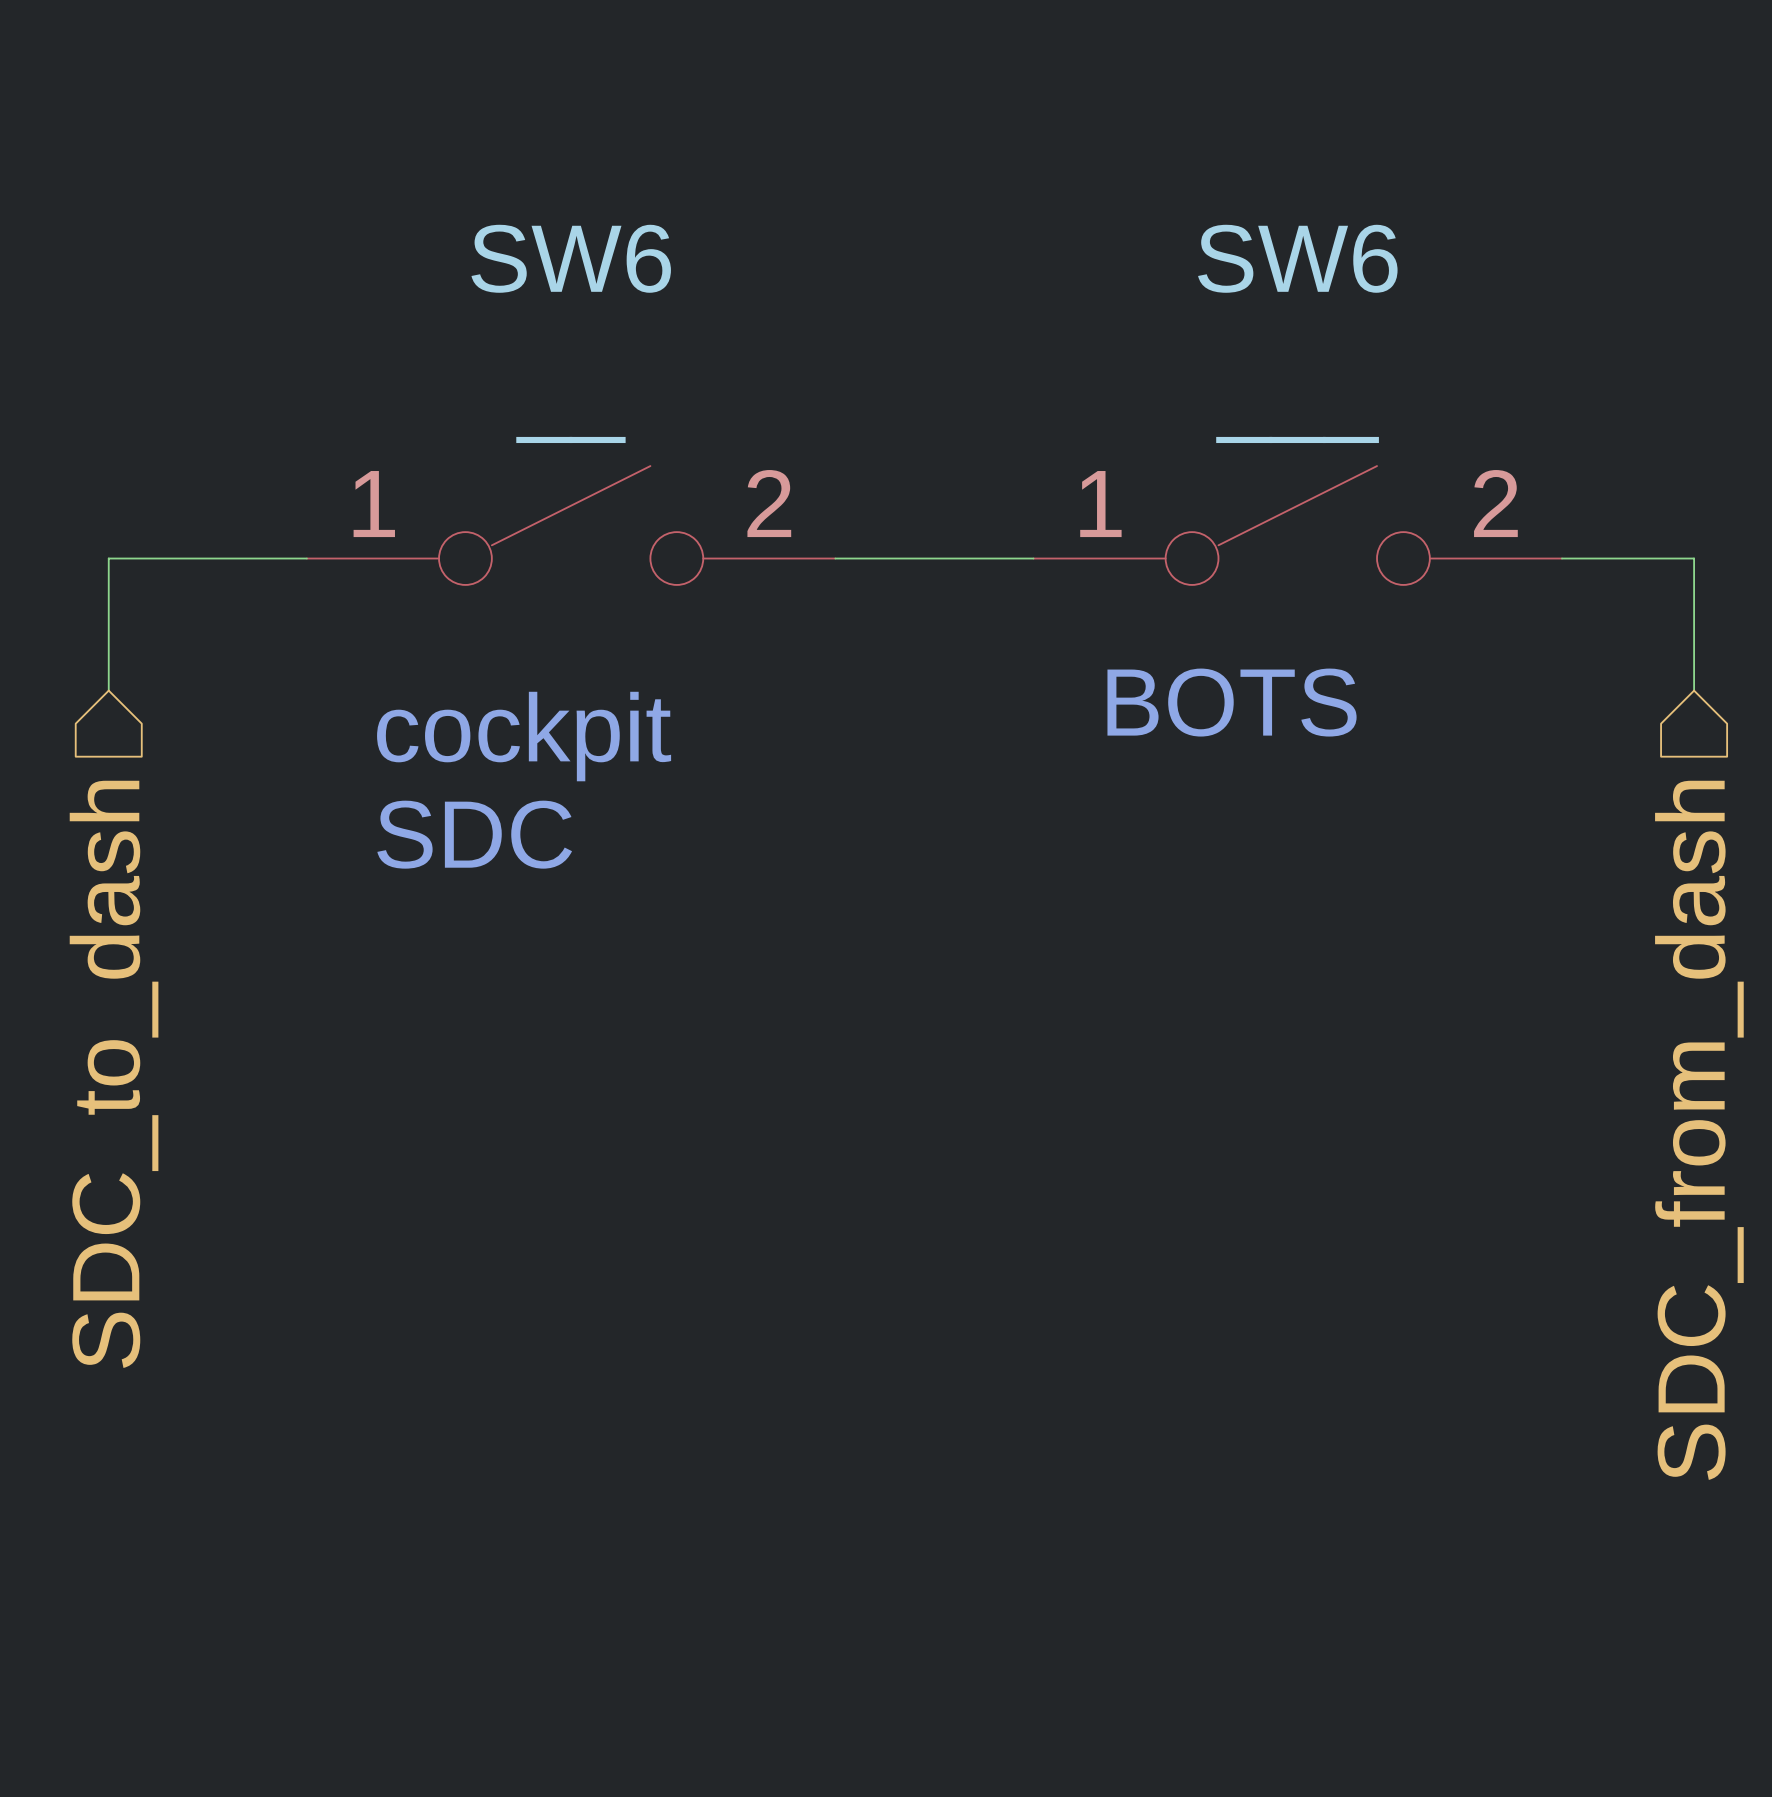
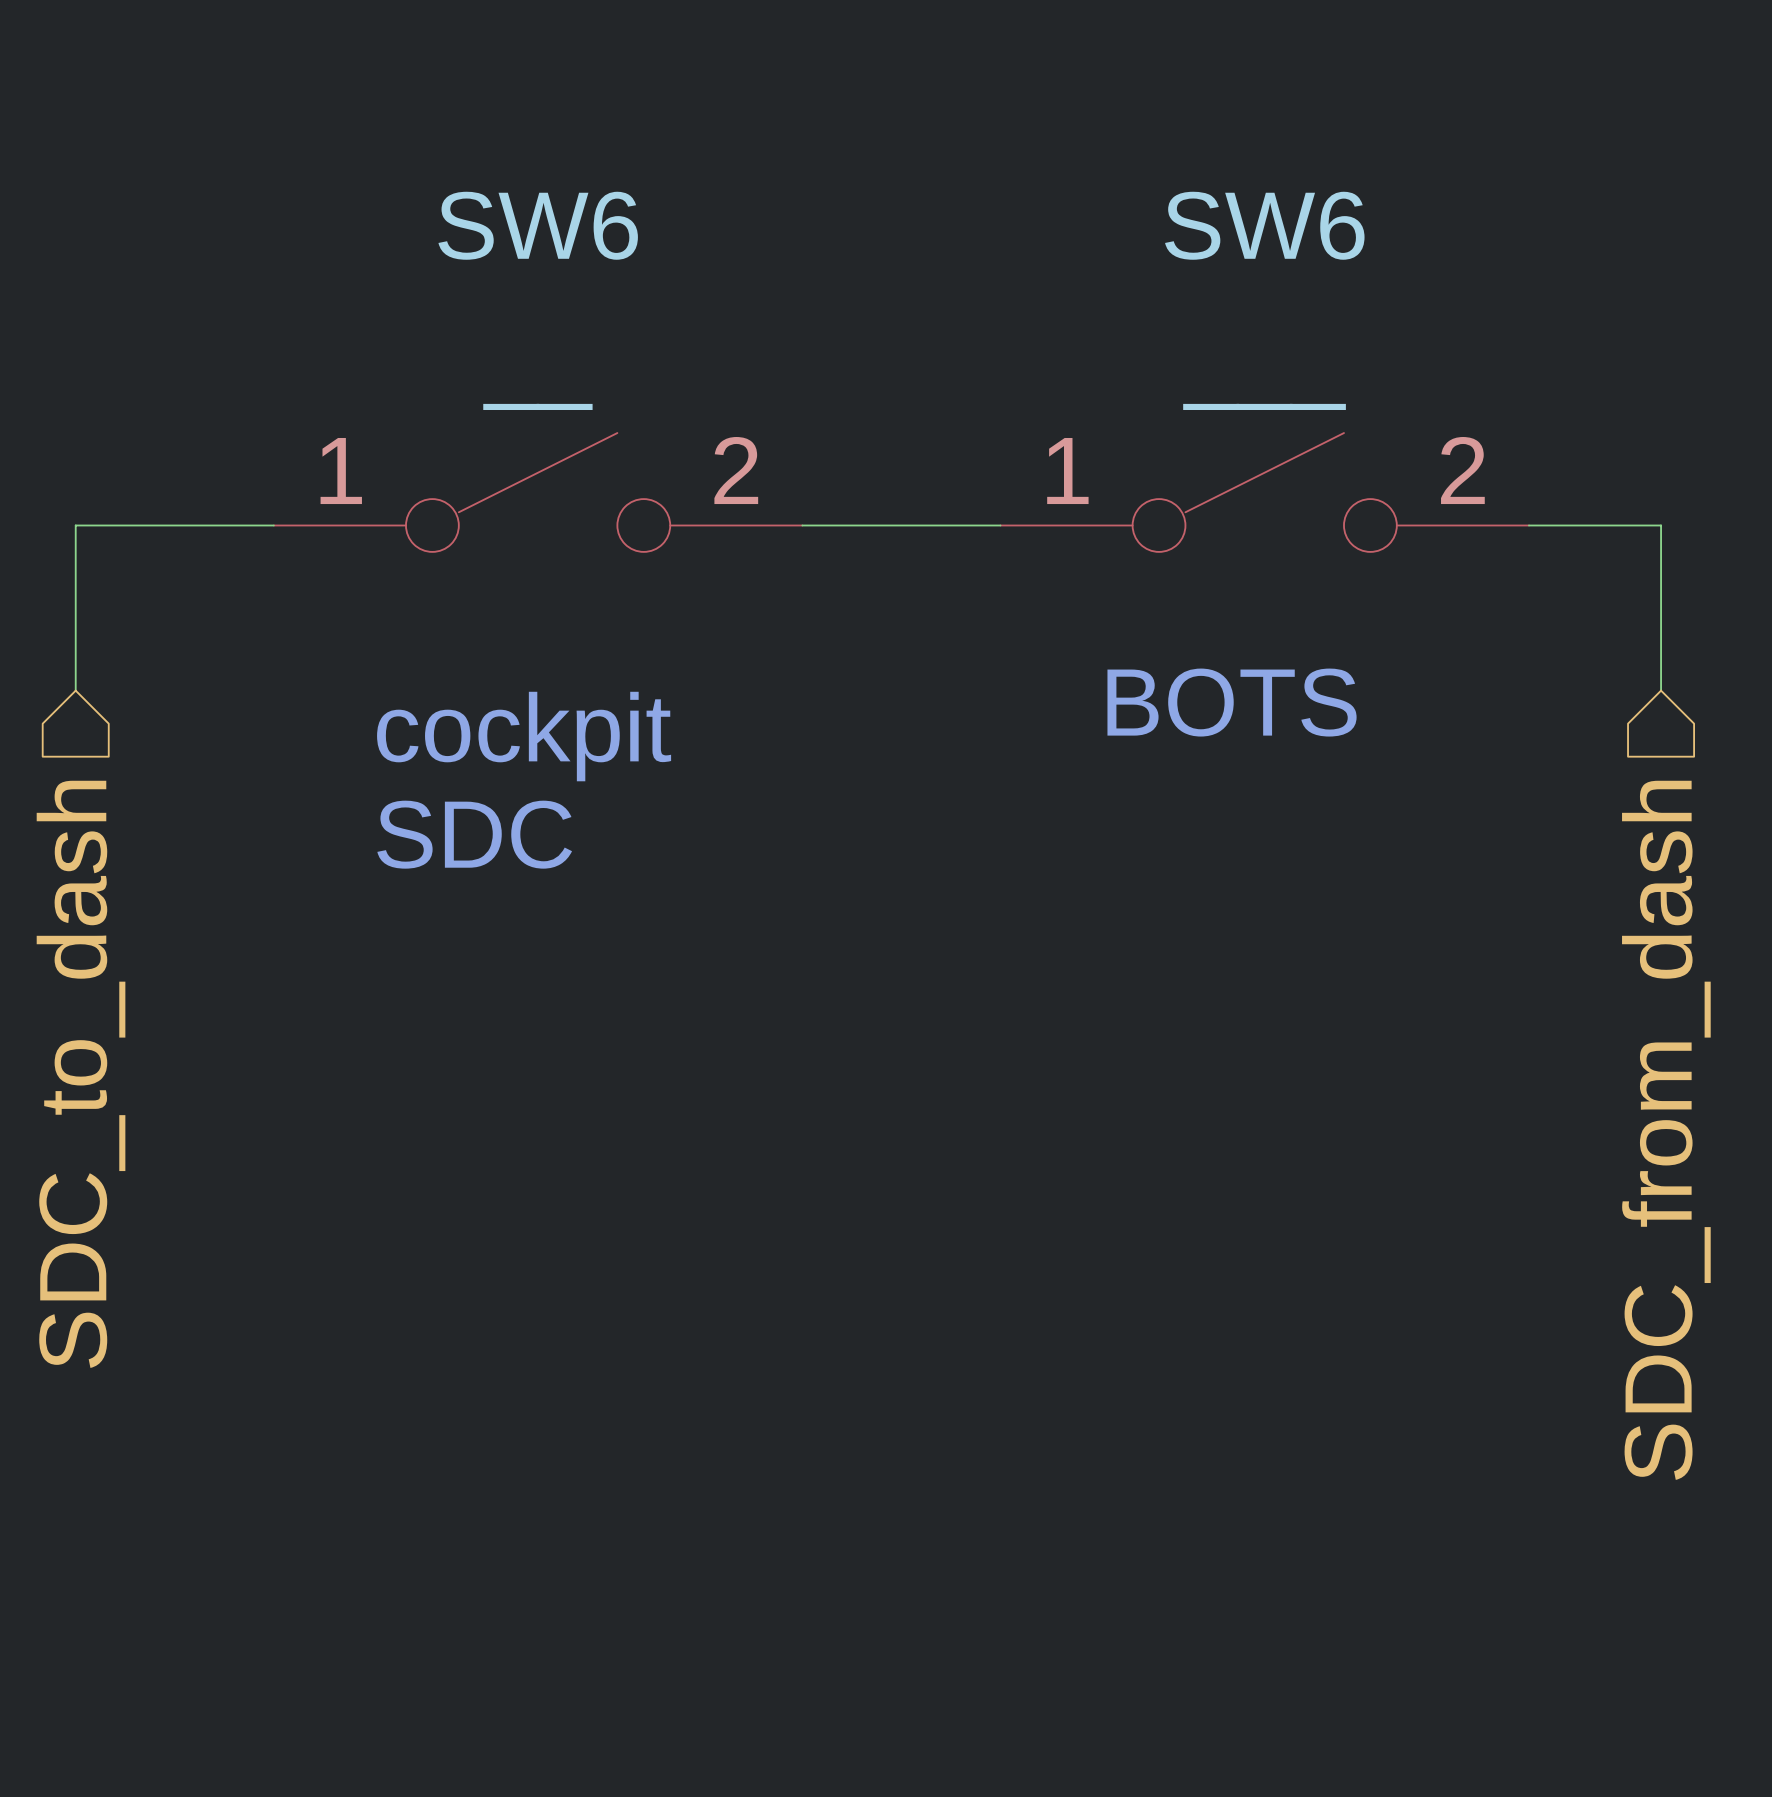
wire: none -> (273, 525) (75, 525) (75, 690)
SW6 position: (571, 525) -> (538, 492)
SW6 position: (1297, 525) -> (1264, 492)
wire: none -> (1528, 525) (1661, 525) (1661, 690)
wire: (306, 558) (108, 558) (108, 690) -> none
wire: (835, 558) (1033, 558) -> (802, 525) (1000, 525)
wire: (1561, 558) (1694, 558) (1694, 690) -> none
hierarchical label position: SDC_to_dash (114, 1074) -> SDC_to_dash (81, 1074)
hierarchical label position: SDC_from_dash (1699, 1130) -> SDC_from_dash (1666, 1130)

